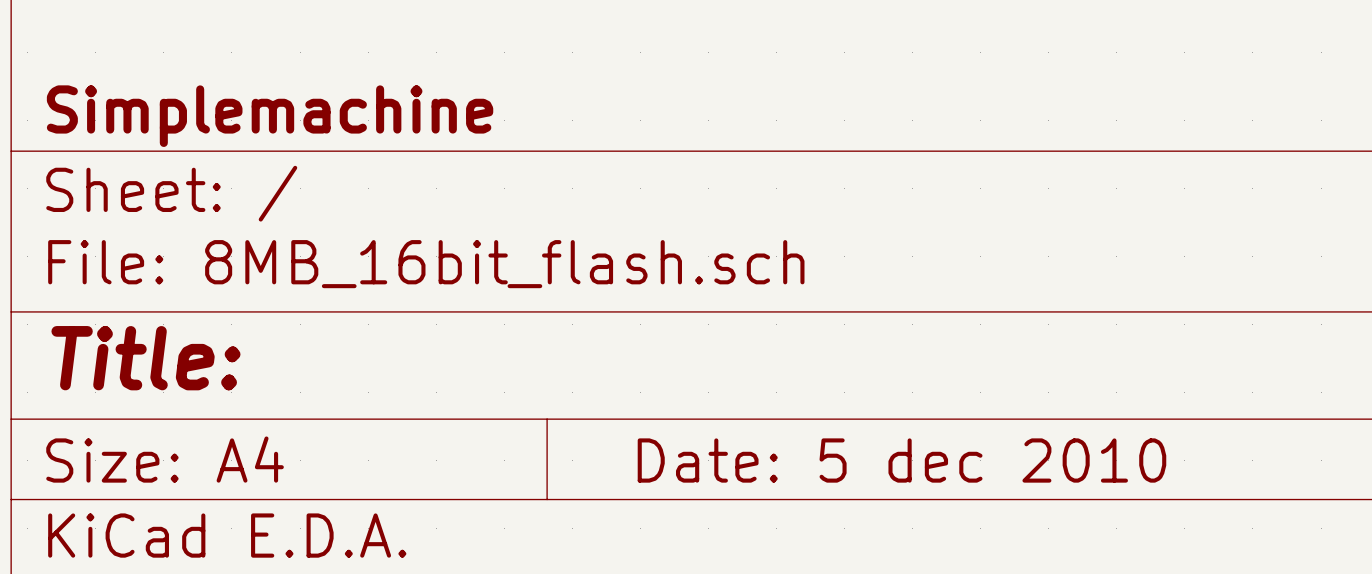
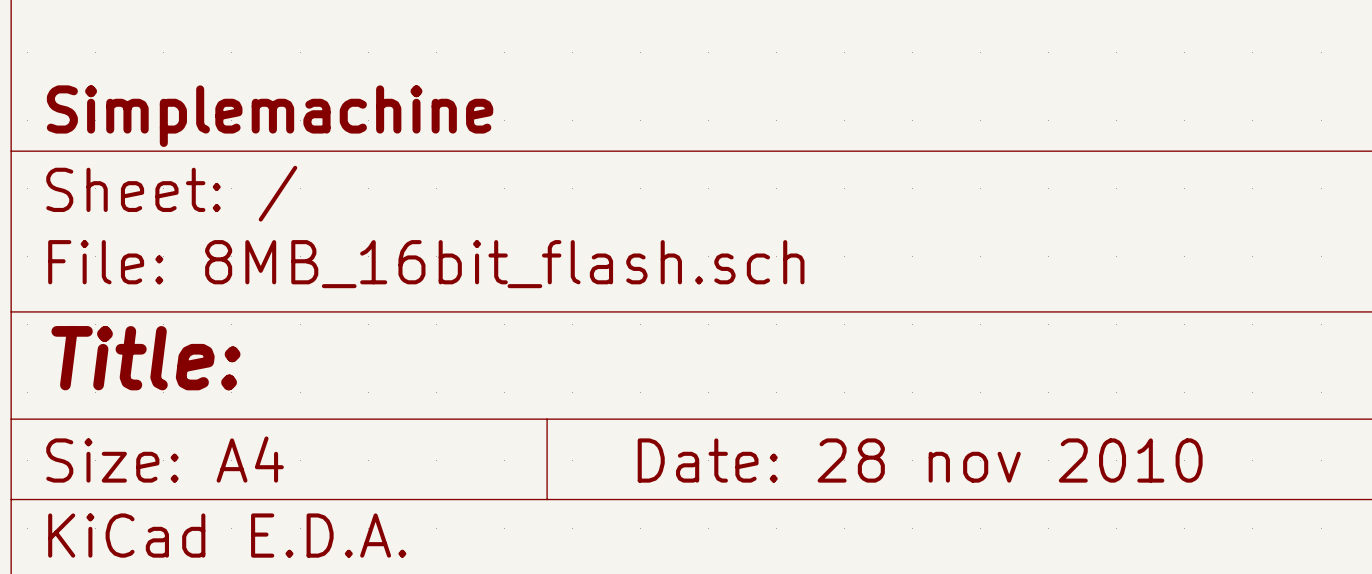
title block: Date: 5 dec 2010 (901, 460) -> Date: 28 nov 2010 (920, 460)

